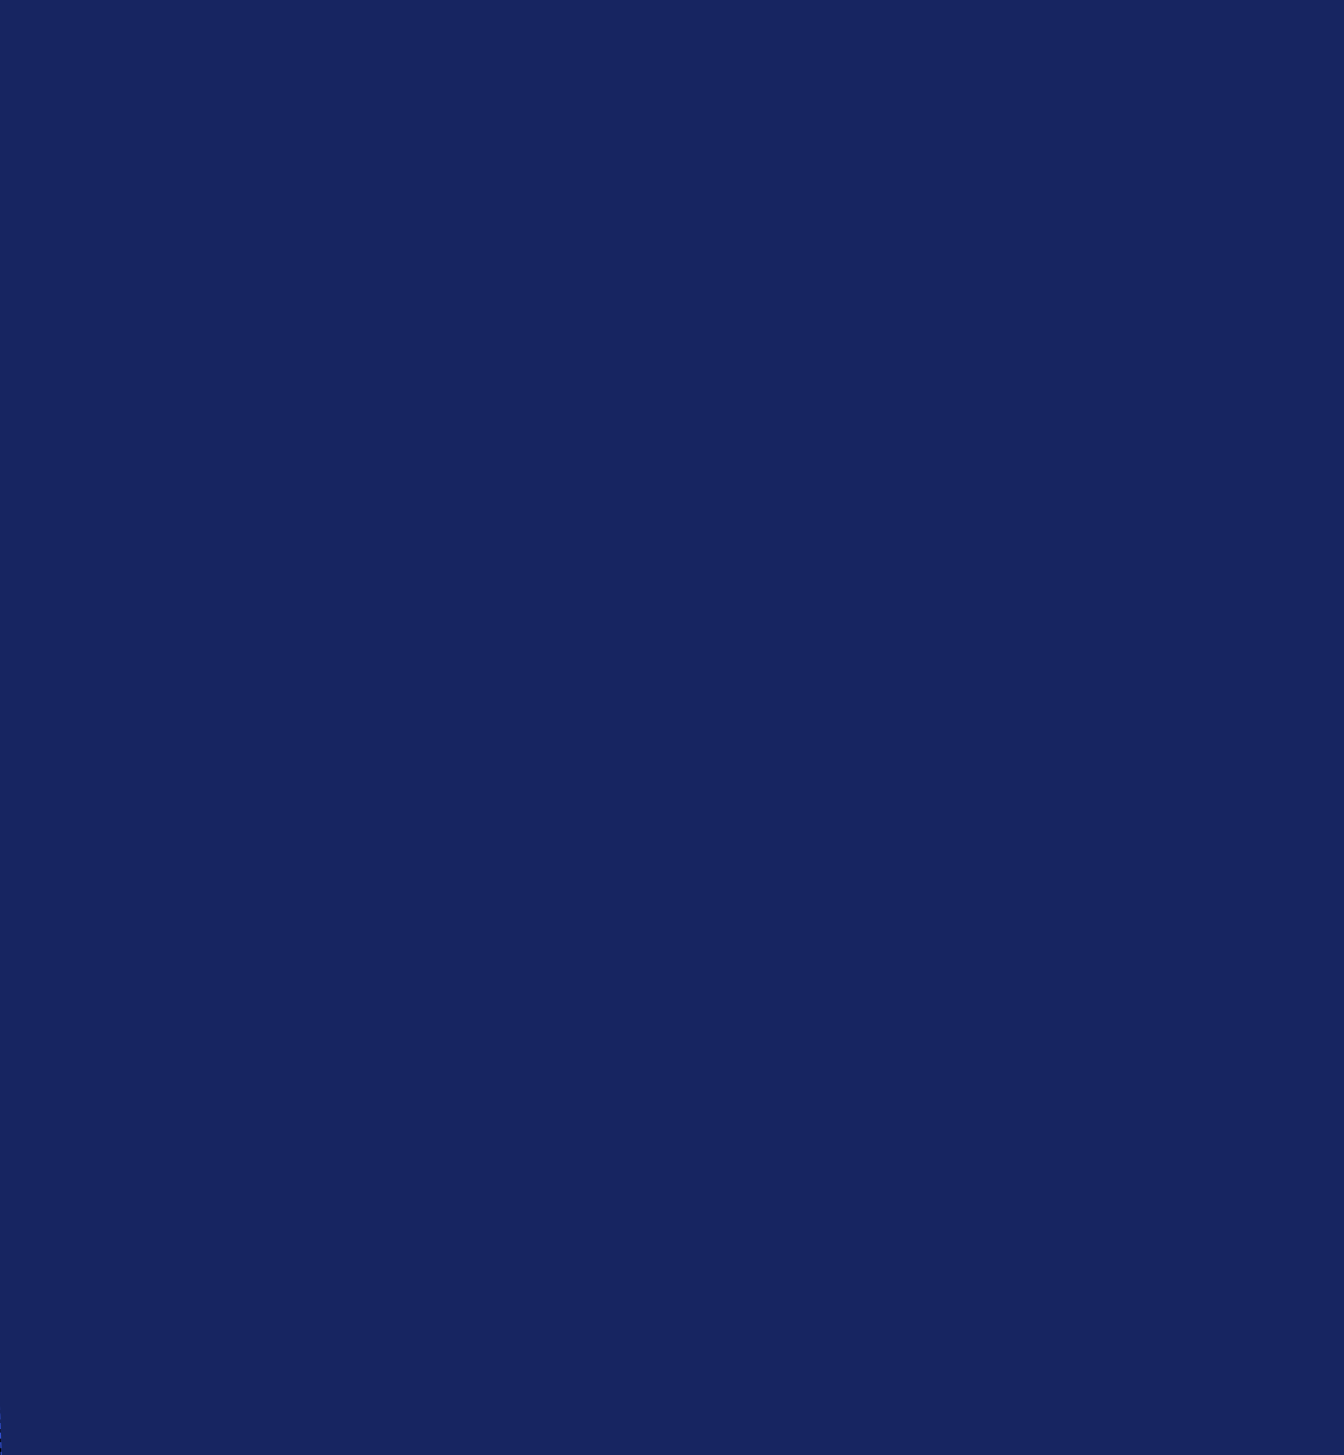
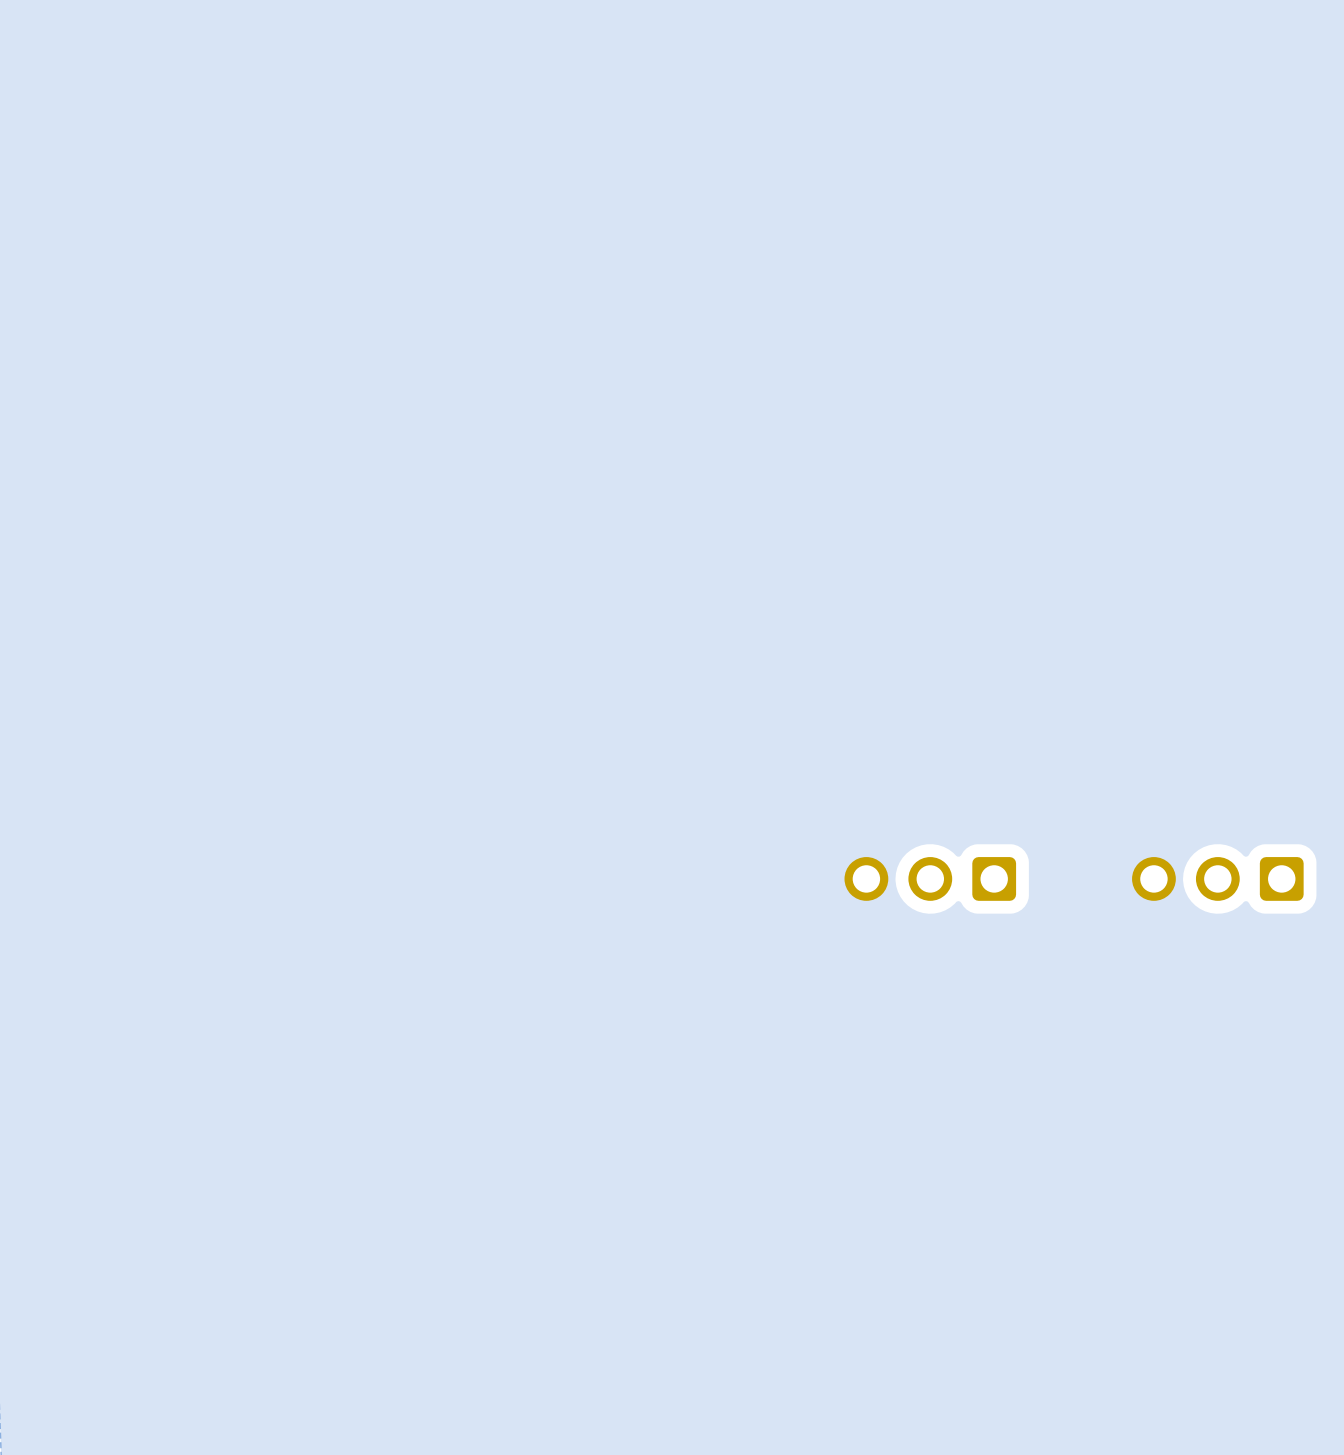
part: none -> (930, 878)
part: none -> (1217, 878)

